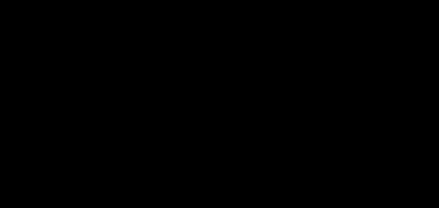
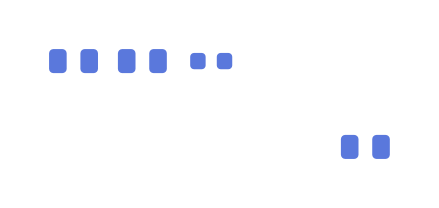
part: none -> (73, 61)
part: none -> (142, 61)
part: none -> (211, 61)
part: none -> (365, 146)

